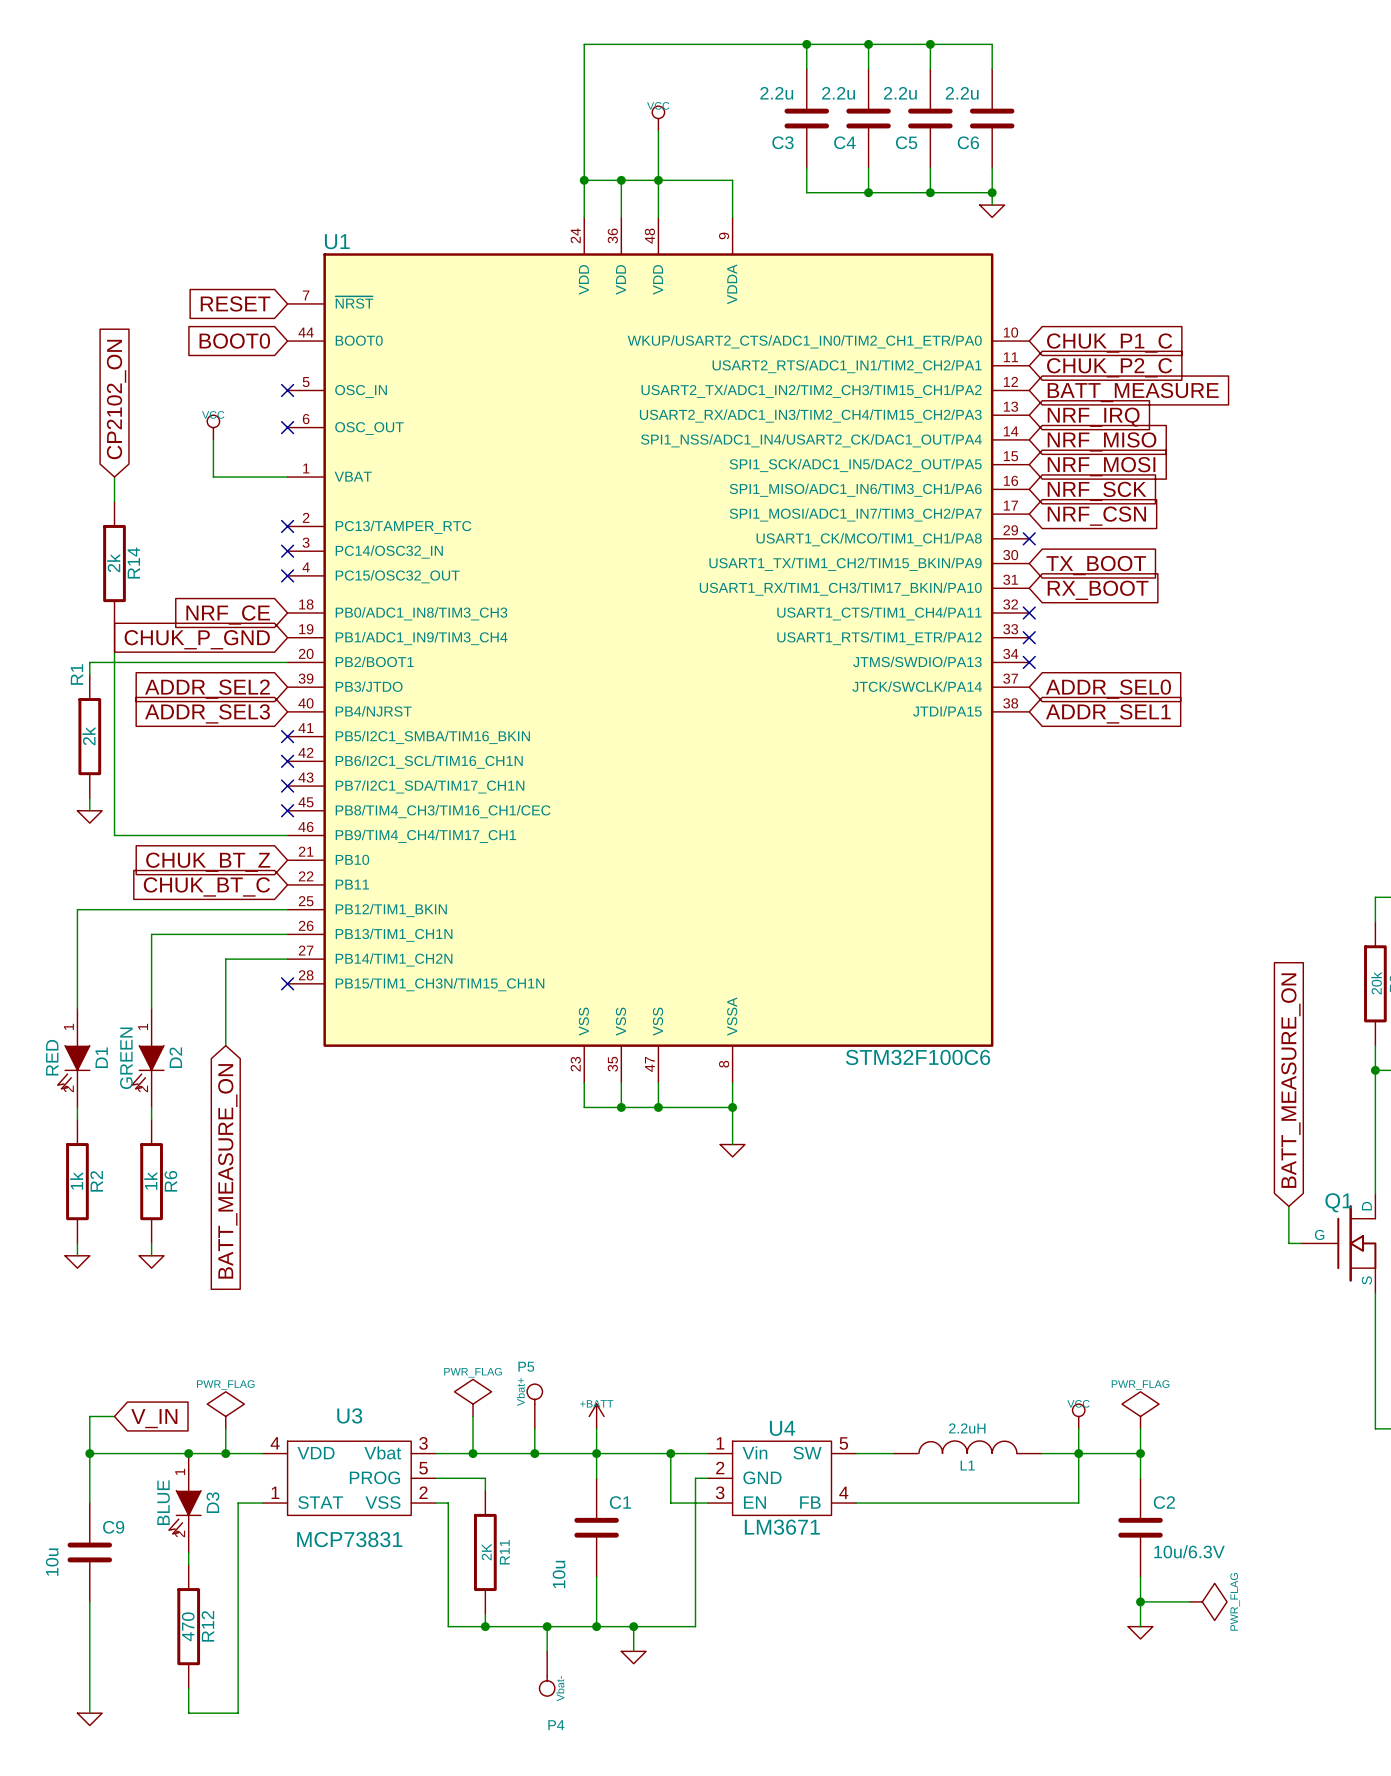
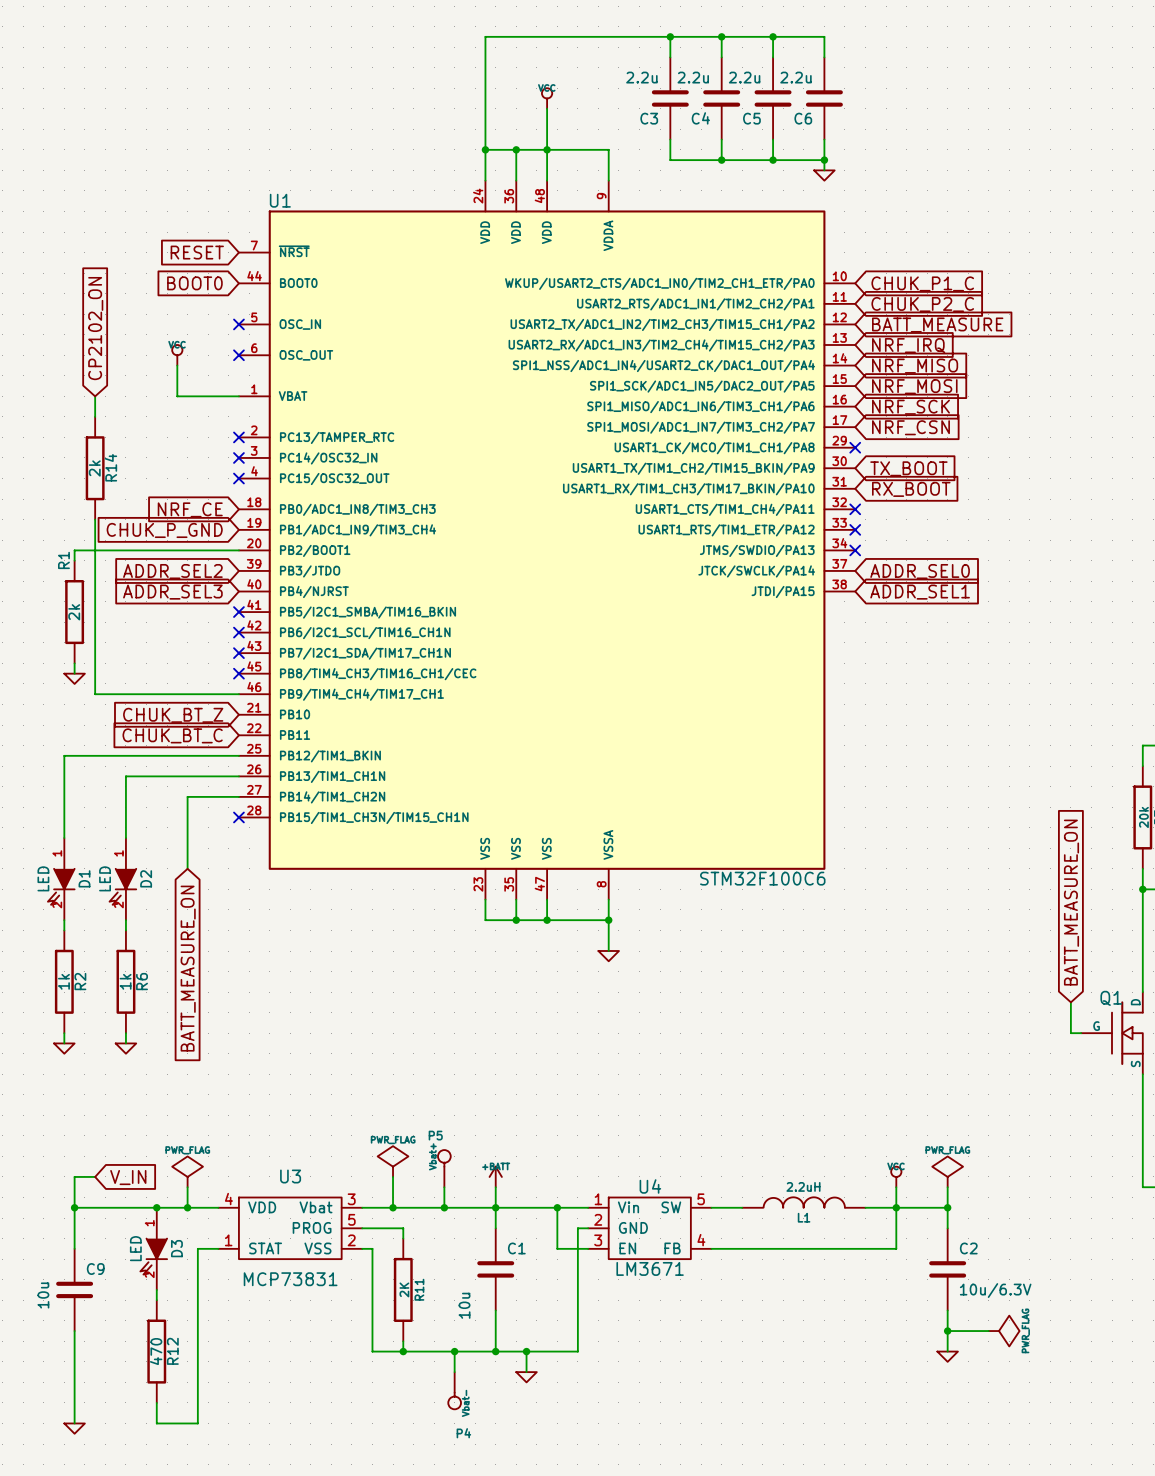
D1 value: RED (52, 1057) -> LED (43, 878)
D2 value: GREEN (126, 1058) -> LED (105, 878)
D3 value: BLUE (163, 1502) -> LED (135, 1248)

